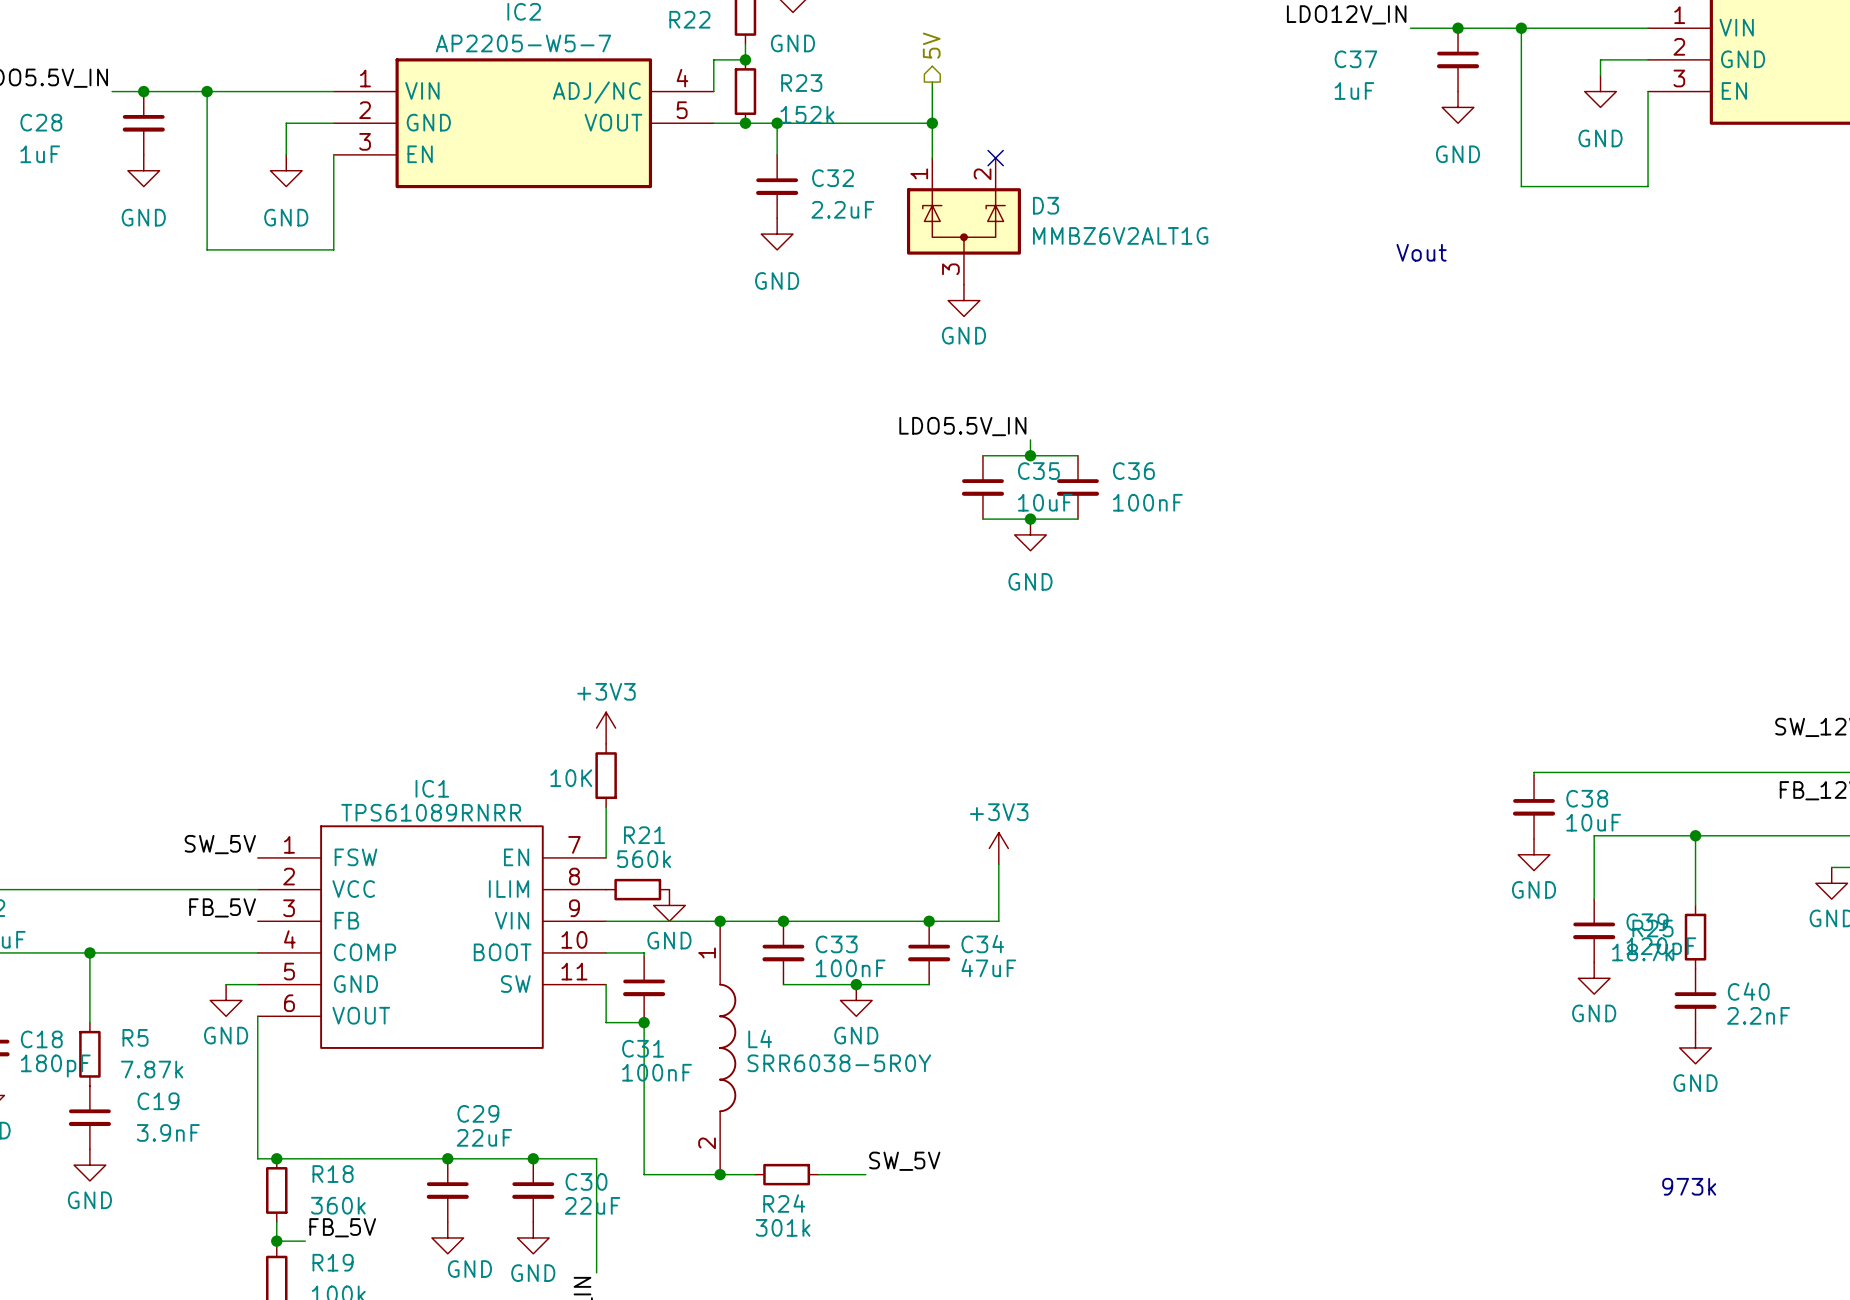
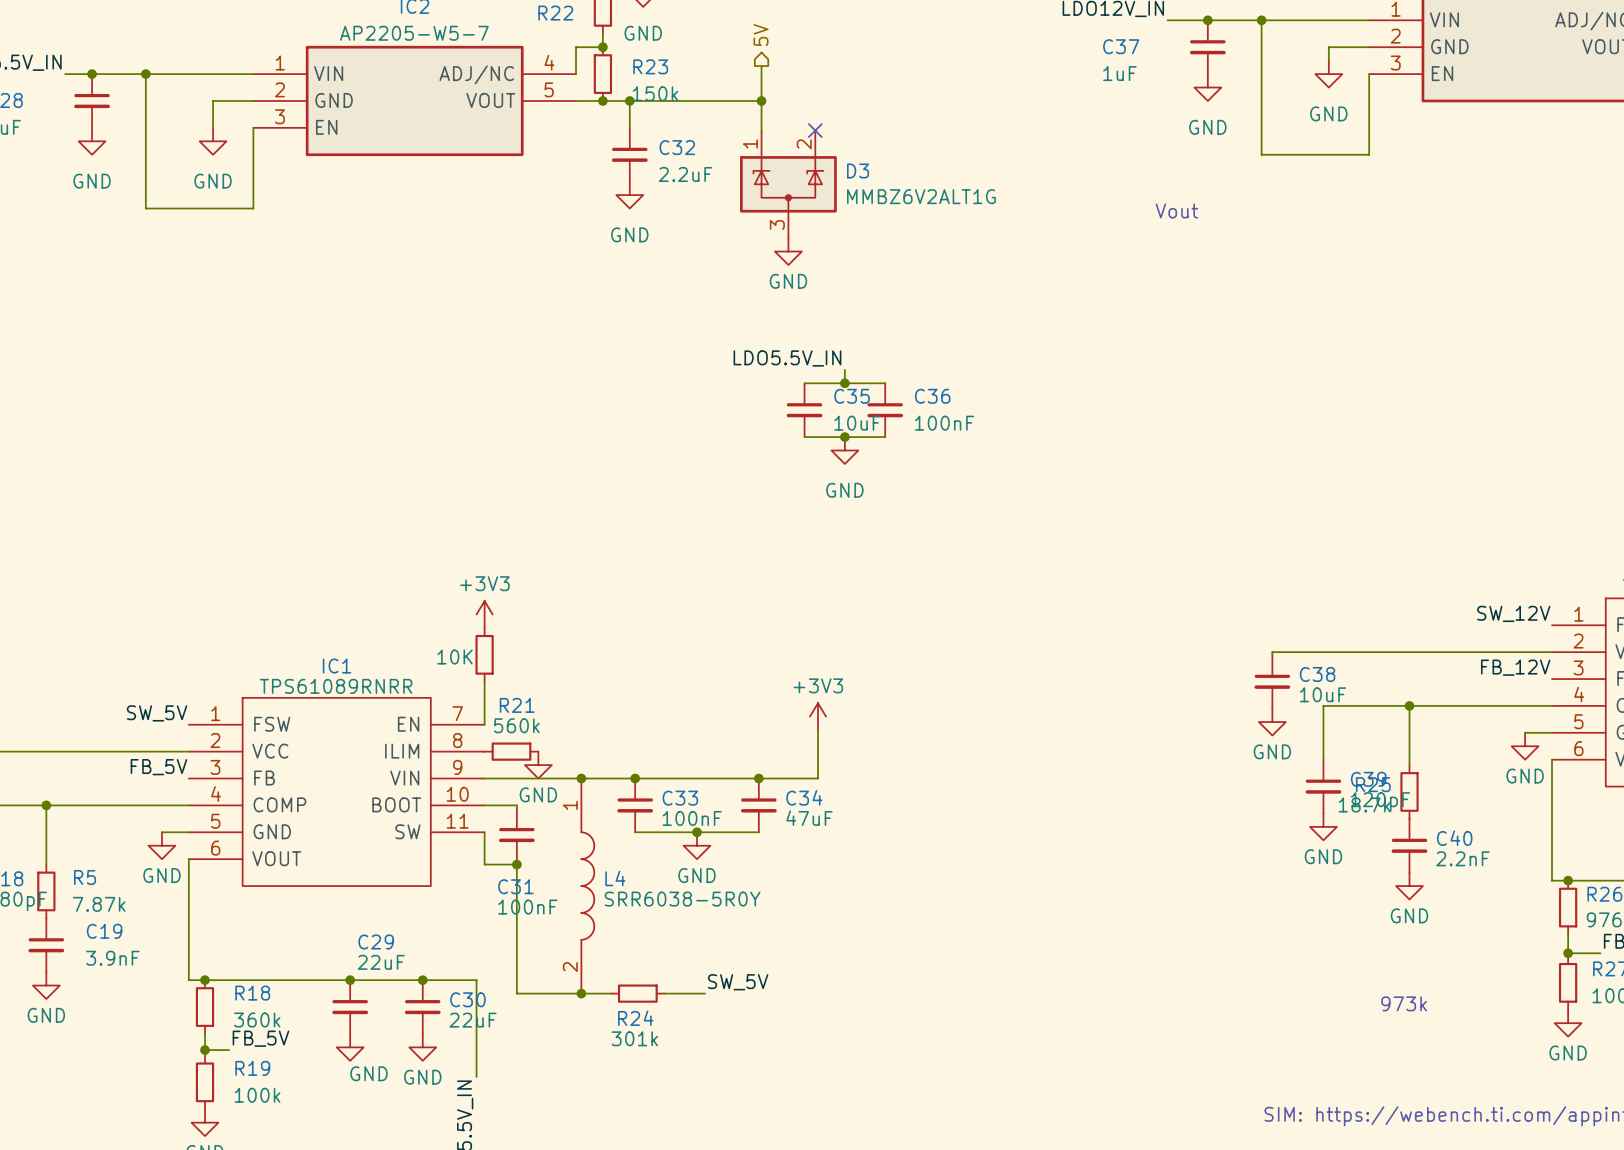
R23 value: 152k (807, 114) -> 150k (655, 93)

